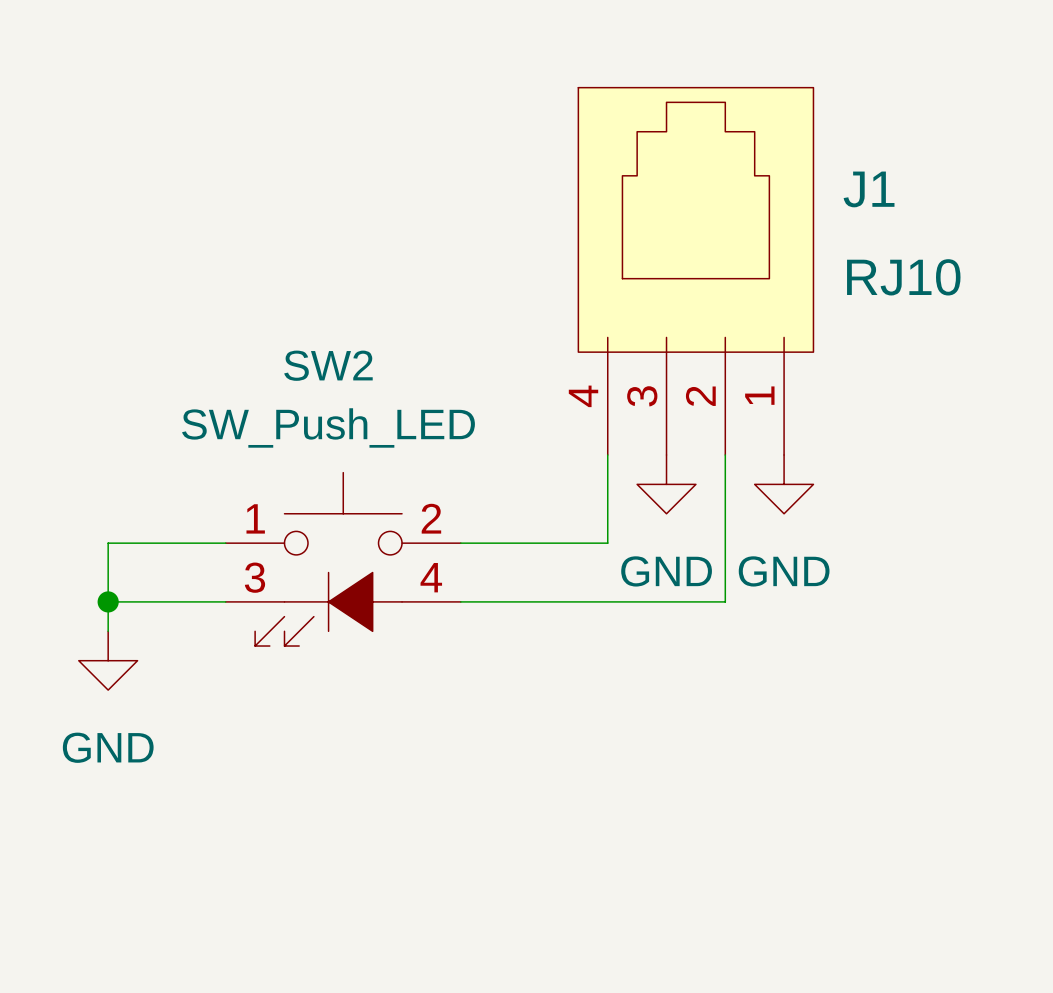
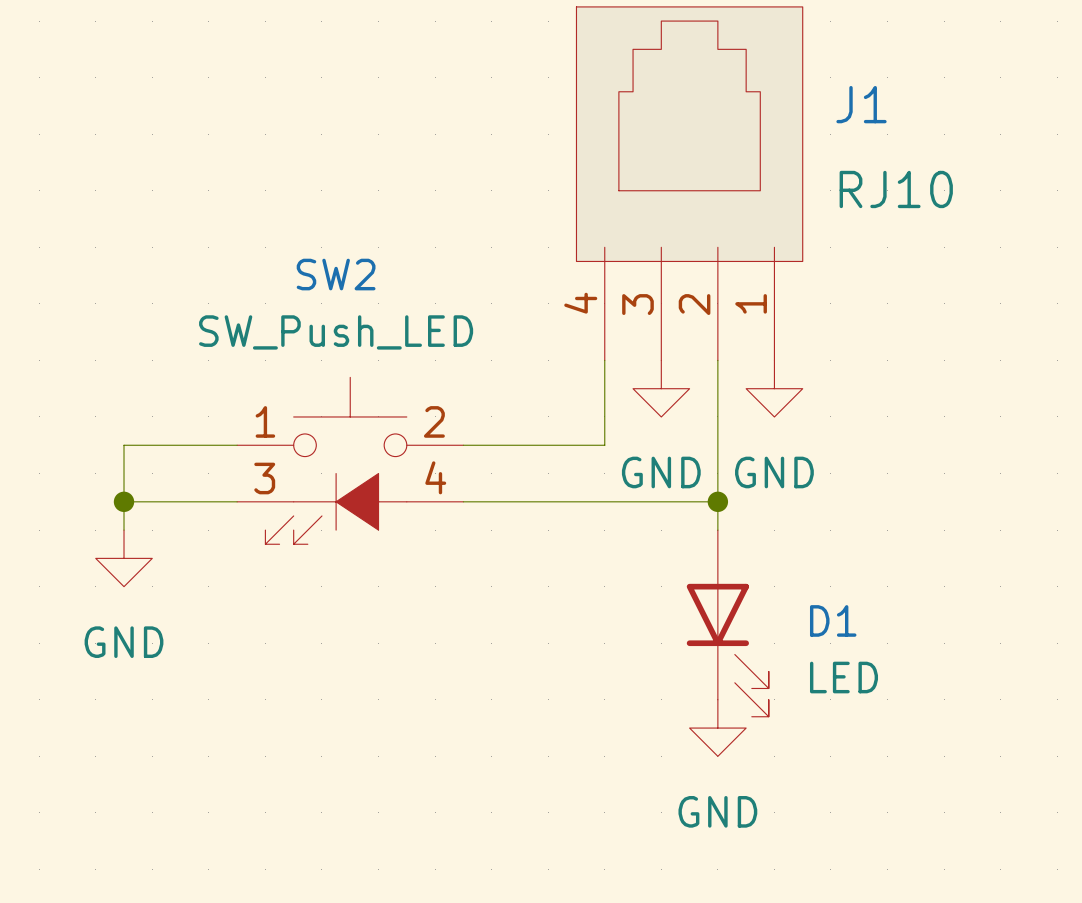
wire: none -> (717, 501) (717, 530)
junction: none -> (717, 501)
D1: none -> LED (727, 623)
power symbol: none -> GND (717, 728)

